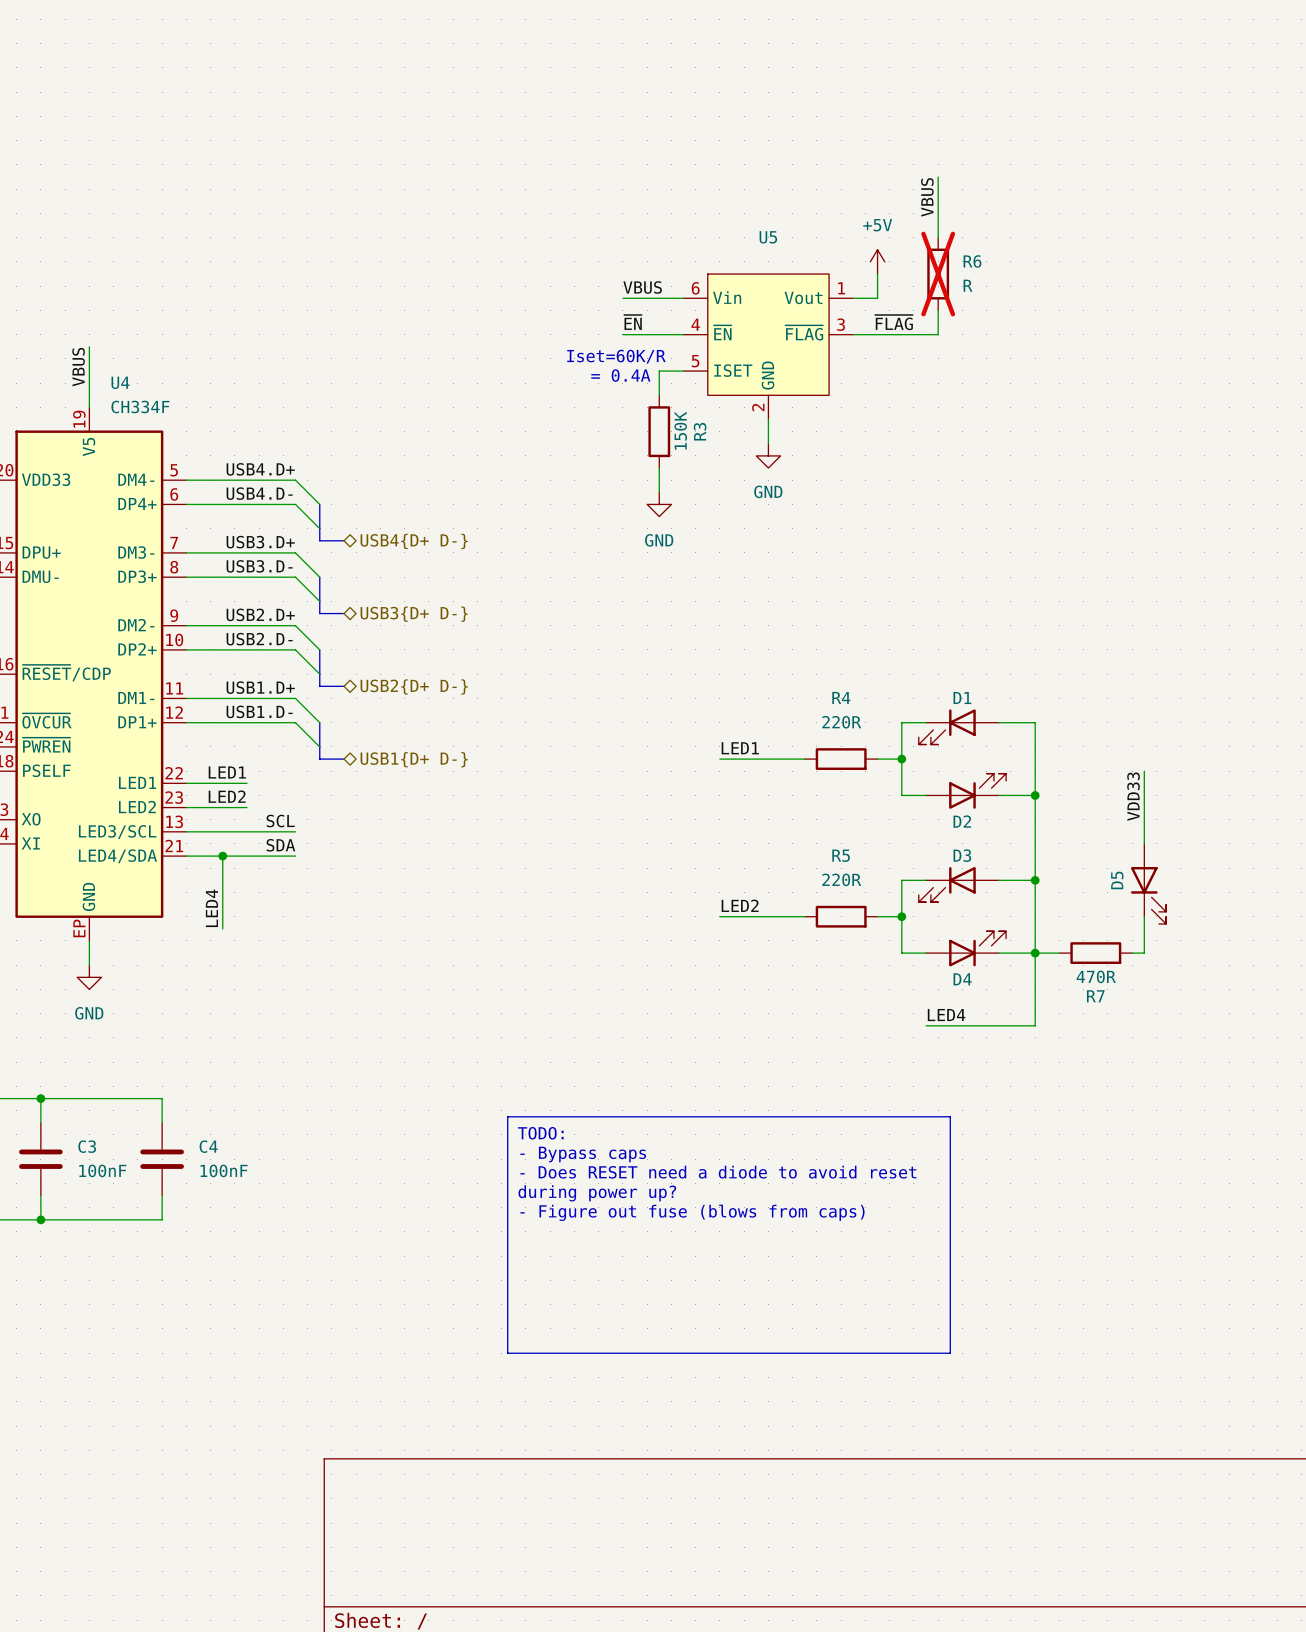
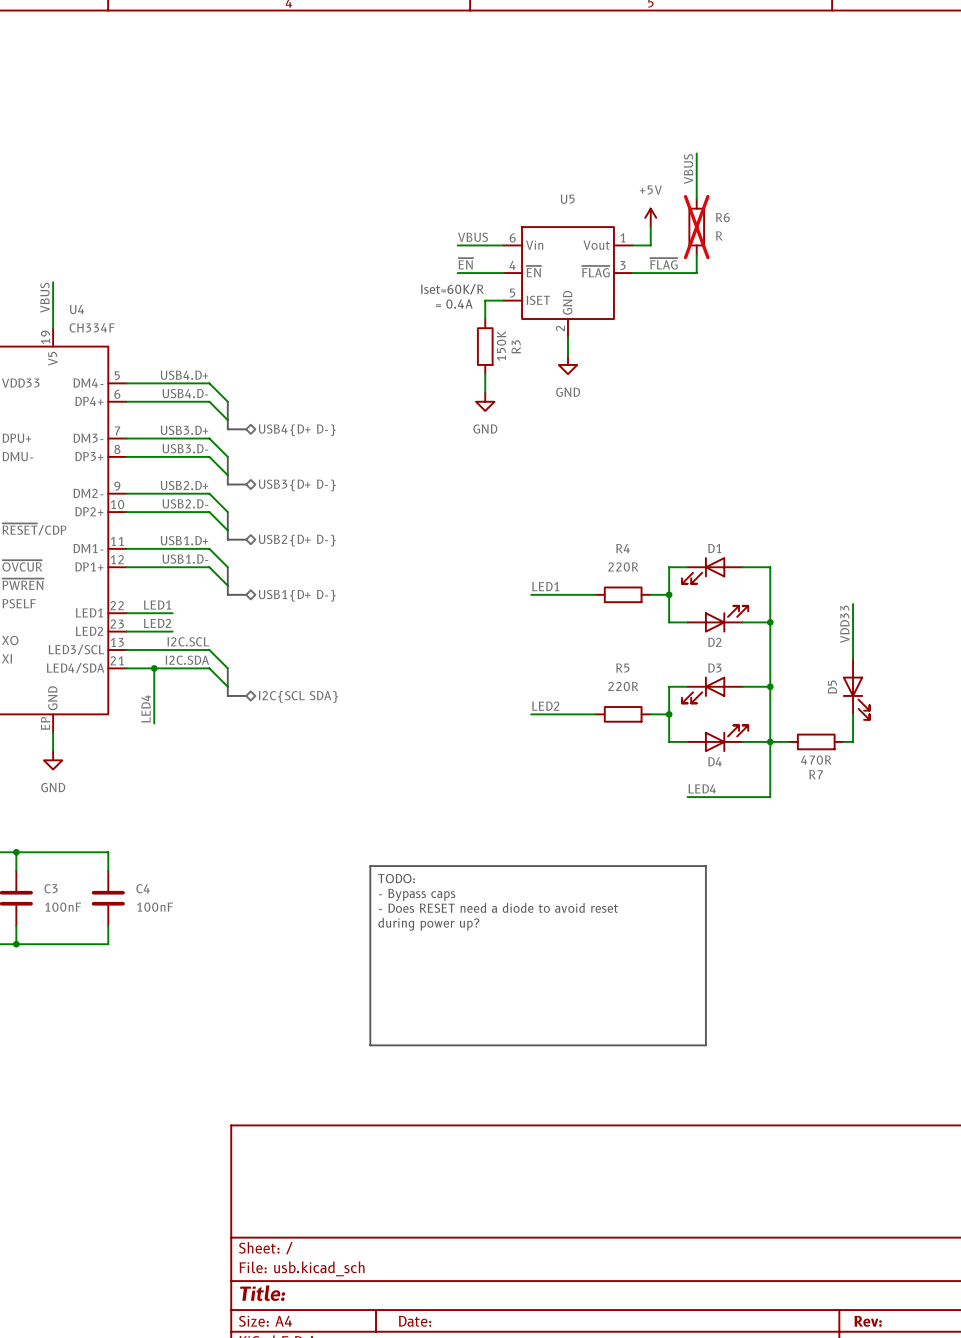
label: SCL (280, 821) -> I2C.SCL (188, 641)
wire: none -> (209, 650) (227, 668)
label: SDA (280, 845) -> I2C.SDA (187, 660)
wire: none -> (209, 668) (227, 686)
bus: none -> (227, 668) (227, 695) (246, 695)
hierarchical label: none -> I2C{SCL SDA} (298, 696)
text: - Figure out fuse (blows from caps) (692, 1212) -> none

